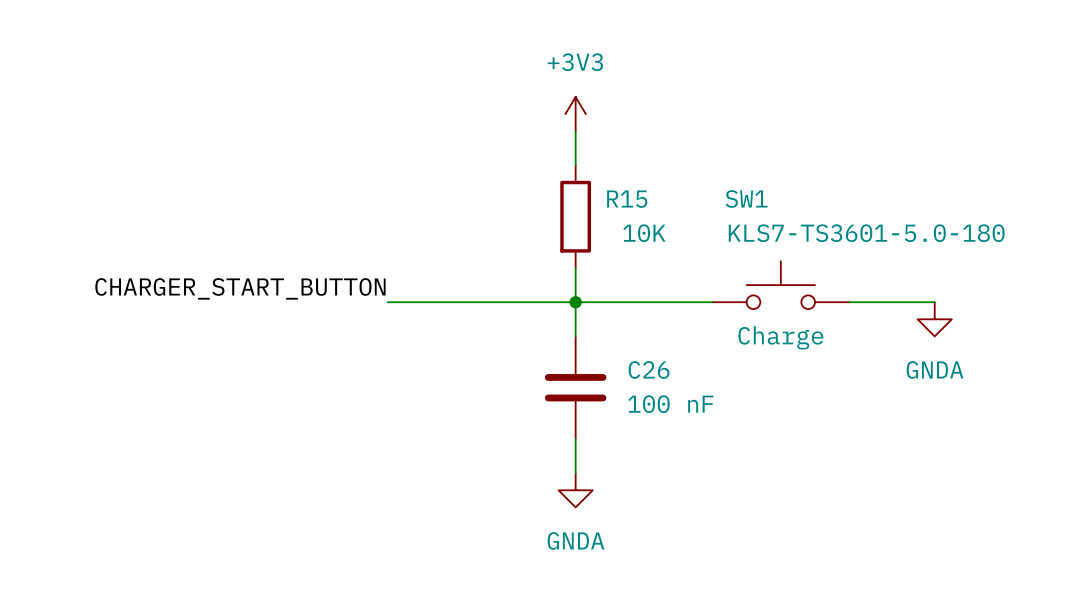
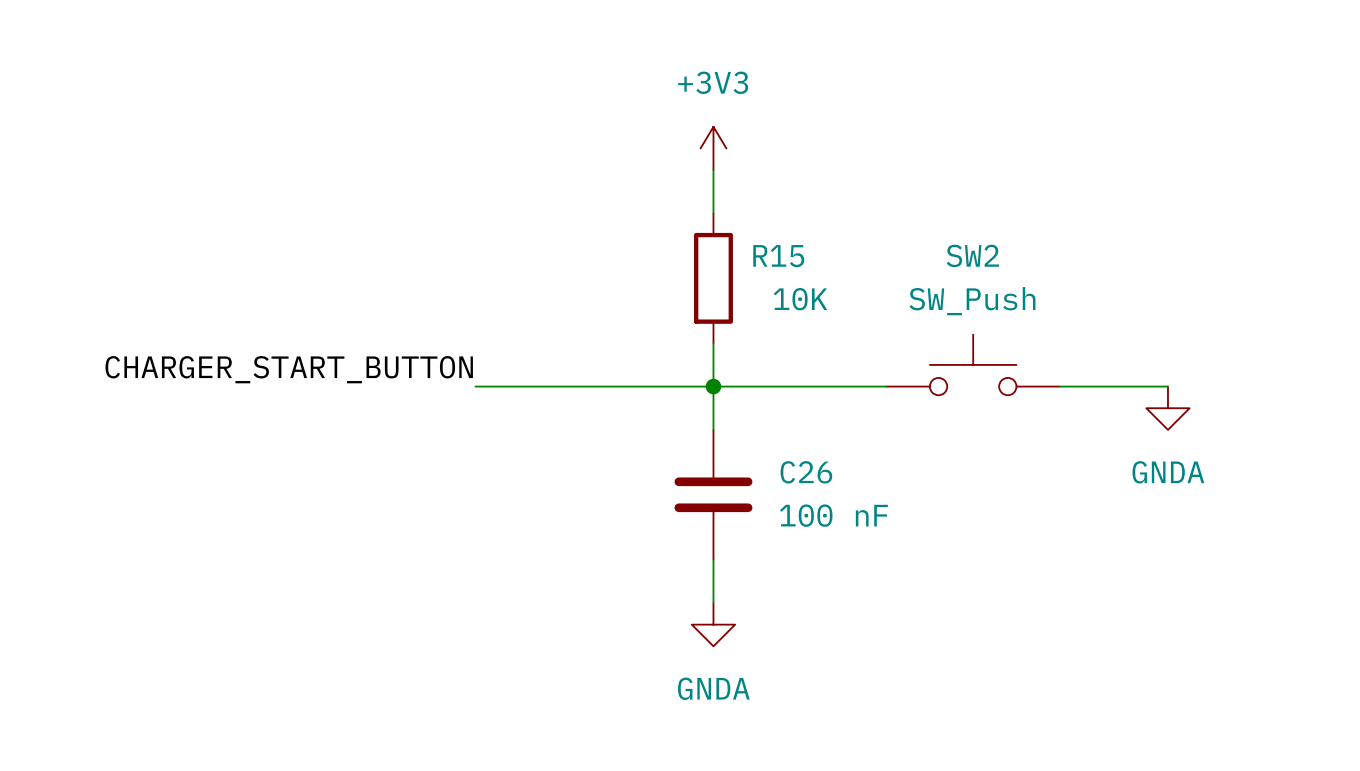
SW1 name: SW1 (746, 198) -> SW2 (972, 255)
SW1 value: KLS7-TS3601-5.0-180 (866, 233) -> SW_Push (972, 301)
SW1 text: Charge (780, 337) -> none

